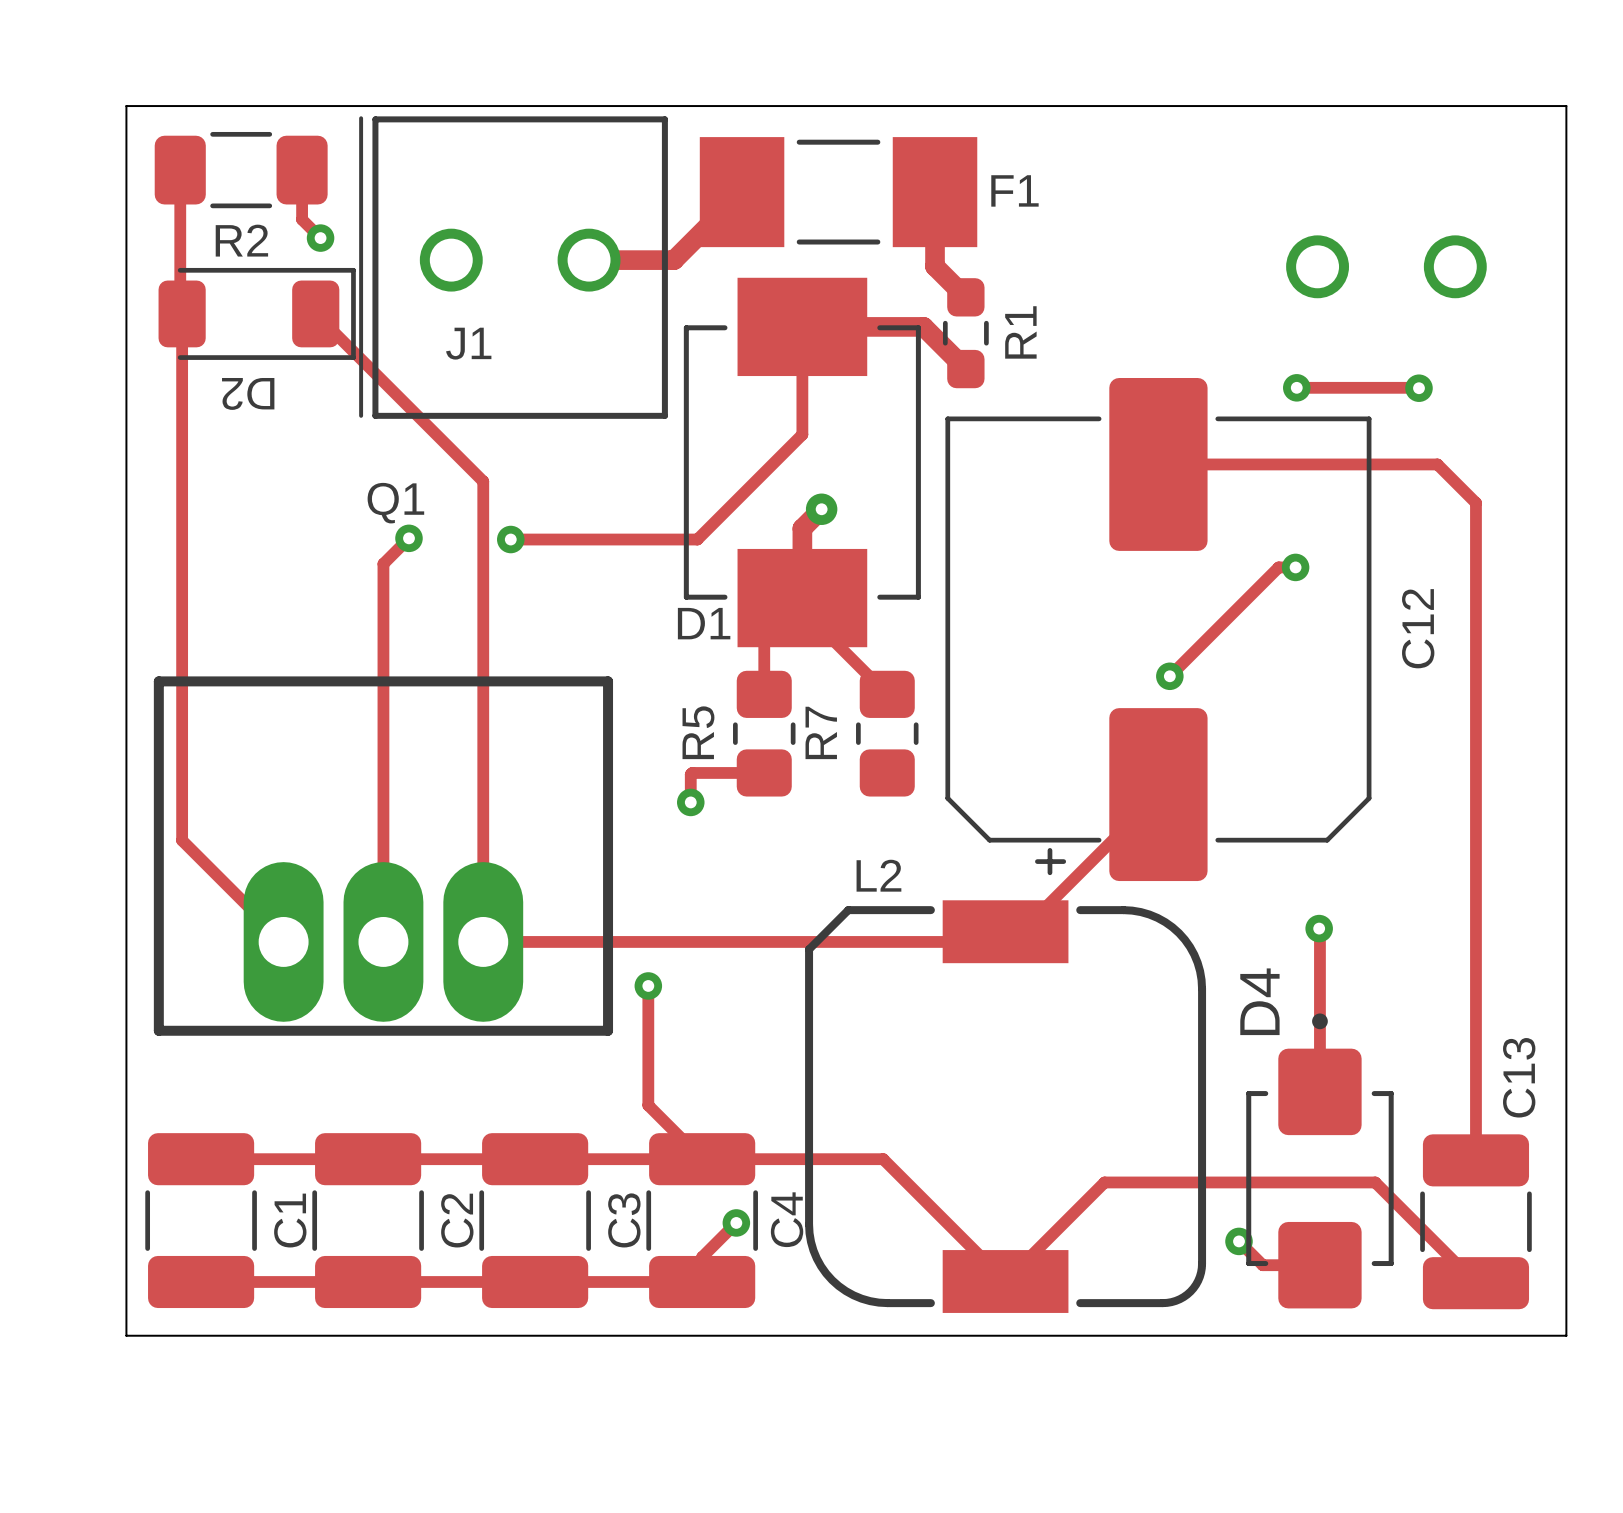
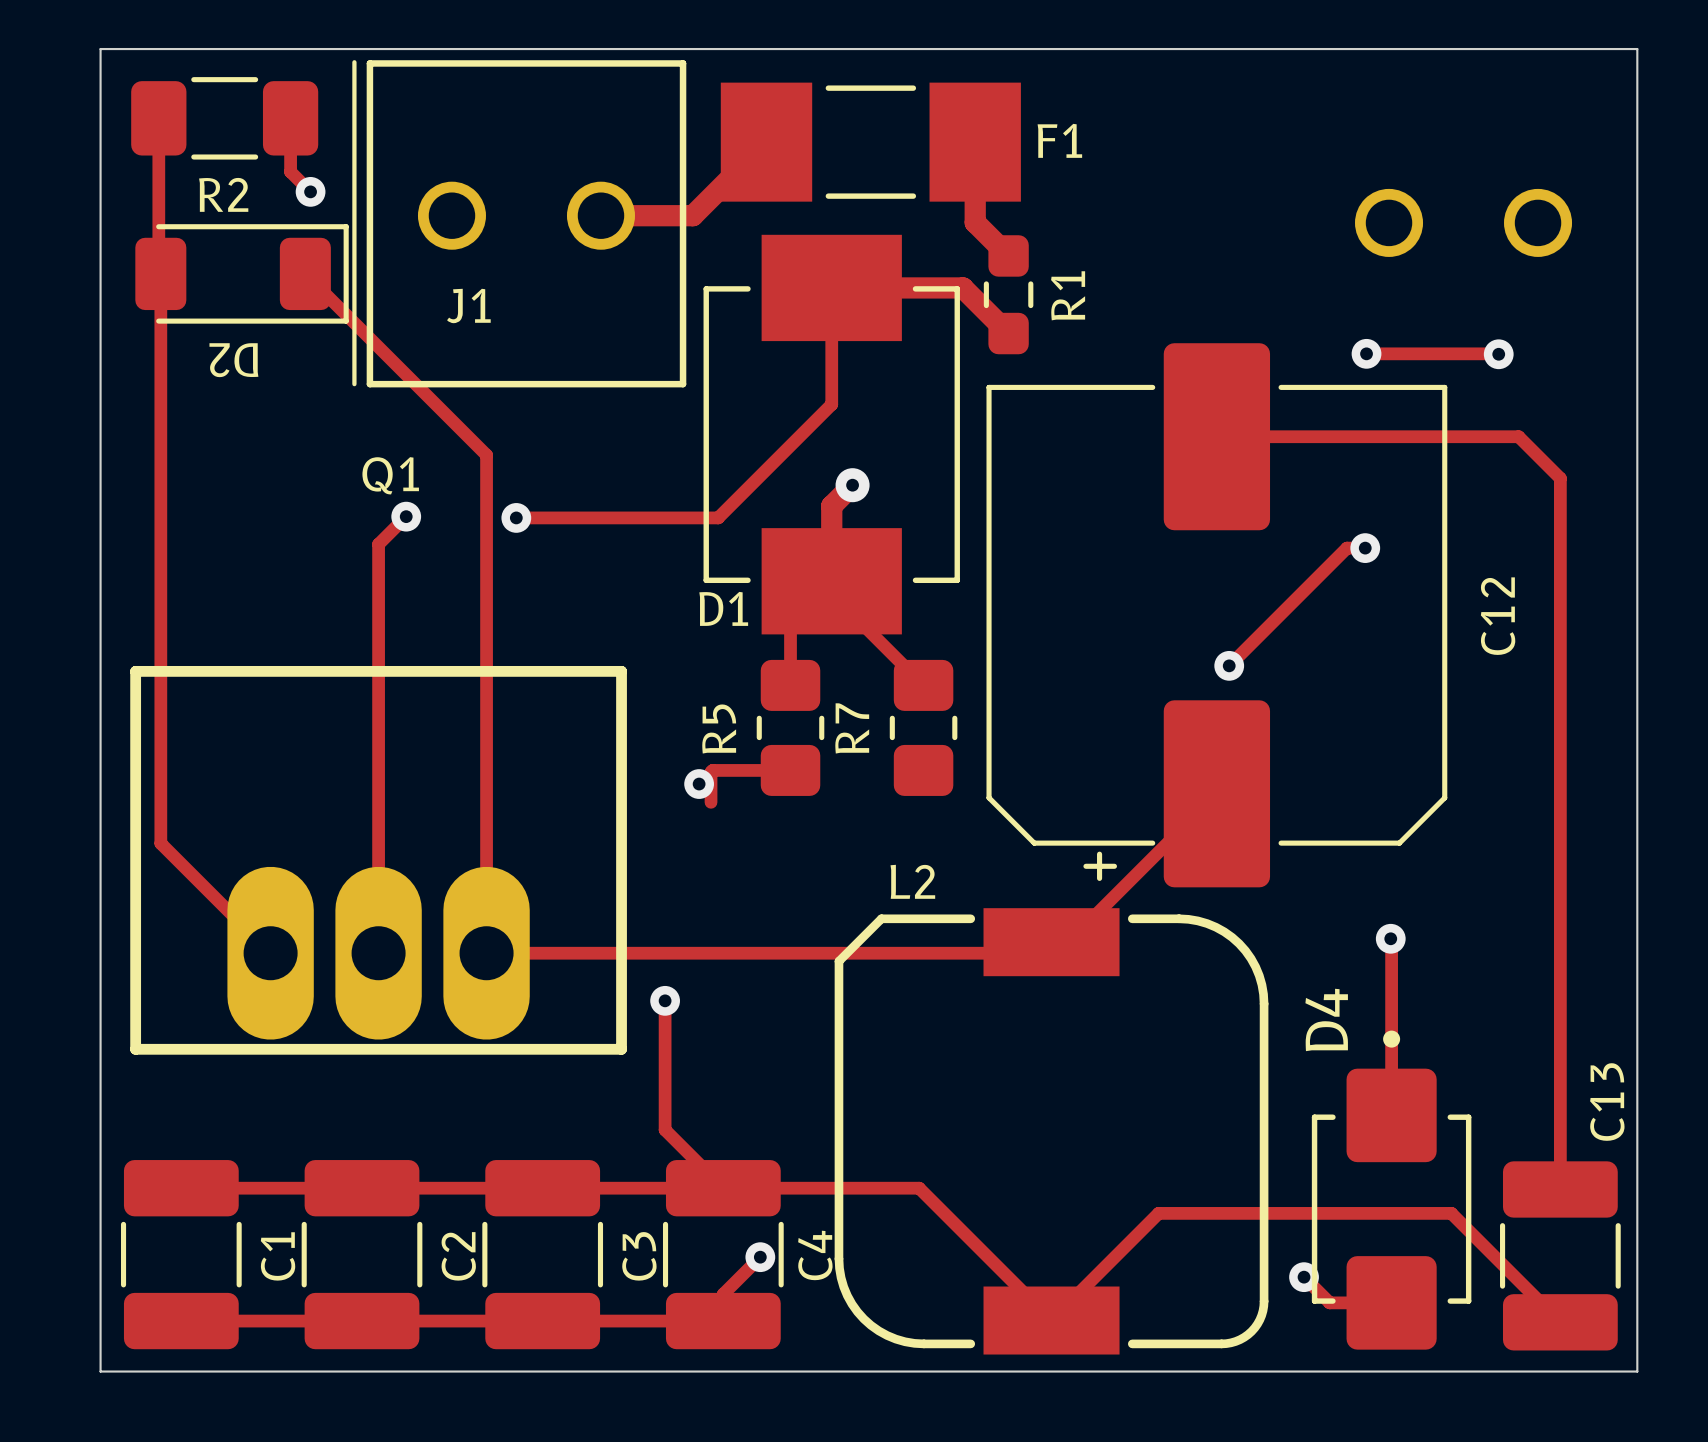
board edge: (1547, 106) (1566, 106) (1566, 1335) (126, 1335) (126, 1328) -> (1637, 49) (1637, 1371) (100, 1371)
via position: (690, 802) -> (699, 784)

